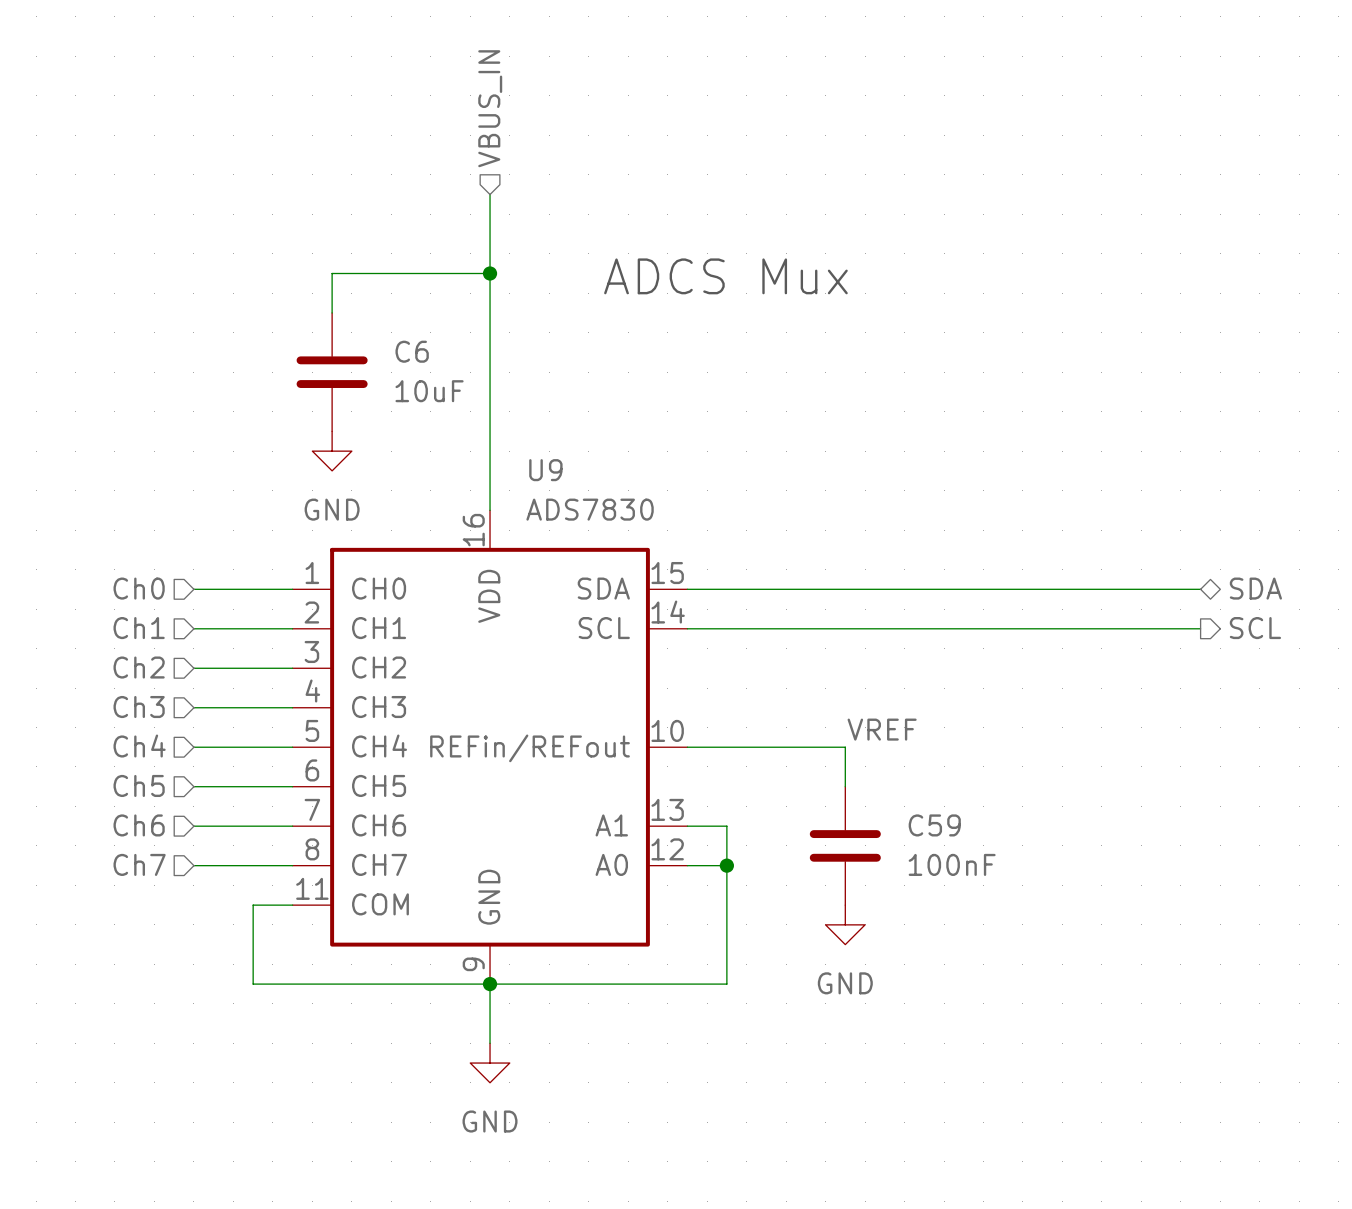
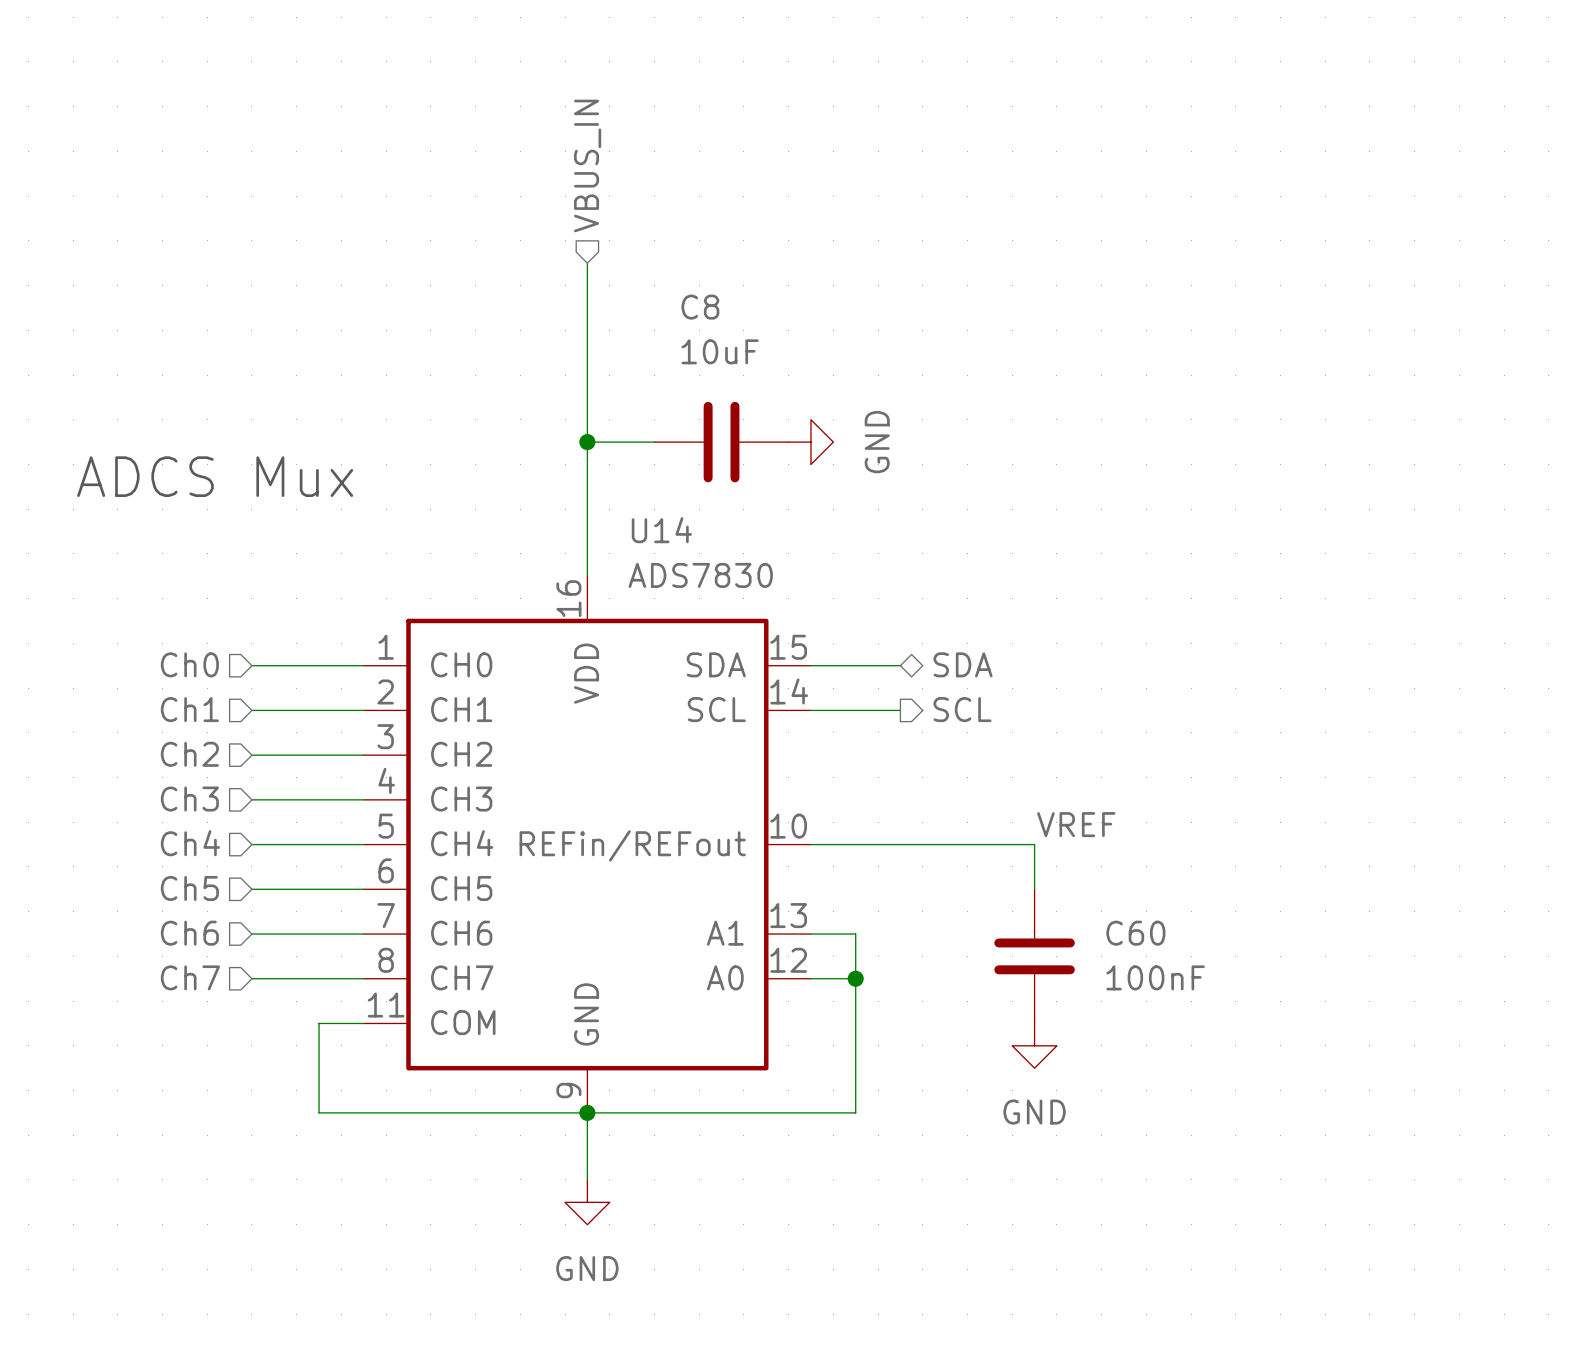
hierarchical label position: VBUS_IN (490, 108) -> VBUS_IN (587, 165)
wire: (490, 194) (490, 234) -> none
wire: (490, 273) (332, 273) (332, 312) -> none
junction: (490, 273) -> none
text: ADCS Mux (725, 276) -> none
C6: 10uF (332, 372) -> none
wire: none -> (587, 442) (654, 442)
junction: none -> (587, 442)
C8: none -> 10uF (721, 442)
power symbol: none -> GND (810, 442)
text: none -> ADCS Mux (215, 476)
power symbol: GND (332, 451) -> none
U9 name: U9 (545, 470) -> U14 (661, 530)
hierarchical label: none -> SDA (963, 664)
hierarchical label: SDA (1255, 588) -> none
wire: (766, 589) (1200, 589) -> none
wire: (766, 628) (1200, 628) -> none
hierarchical label: none -> SCL (962, 709)
hierarchical label: SCL (1255, 628) -> none
label position: VREF (882, 729) -> VREF (1076, 824)
wire: (845, 747) (845, 786) -> (989, 844) (1034, 844) (1034, 889)
C59: 100nF (845, 845) -> none
C60: none -> 100nF (1034, 956)
power symbol position: GND (845, 924) -> GND (1034, 1045)

